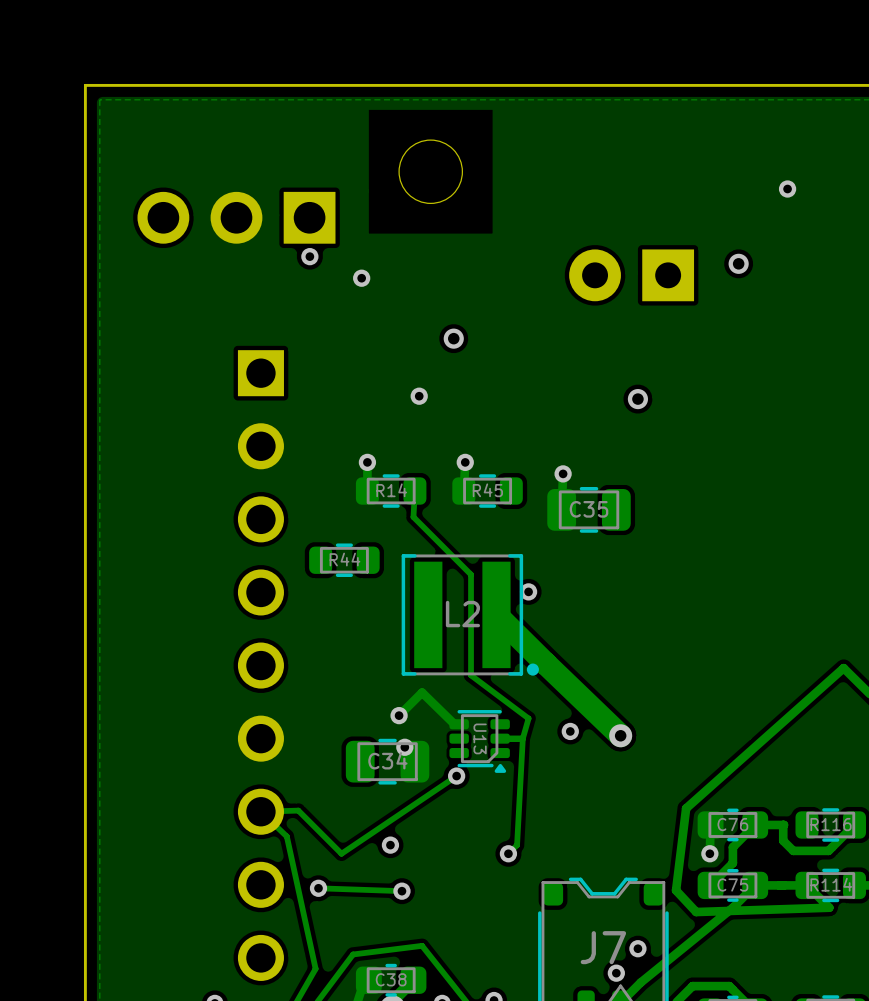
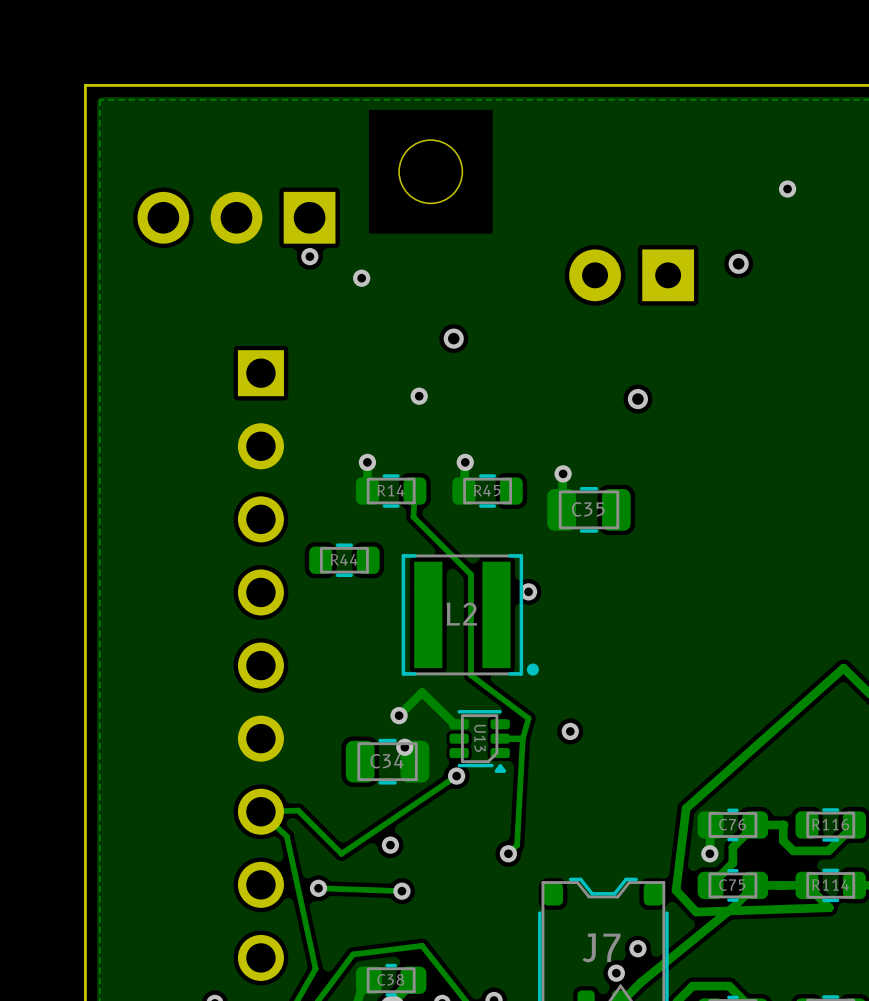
track: (496, 614) (620, 735) -> none
via: (620, 735) -> none

